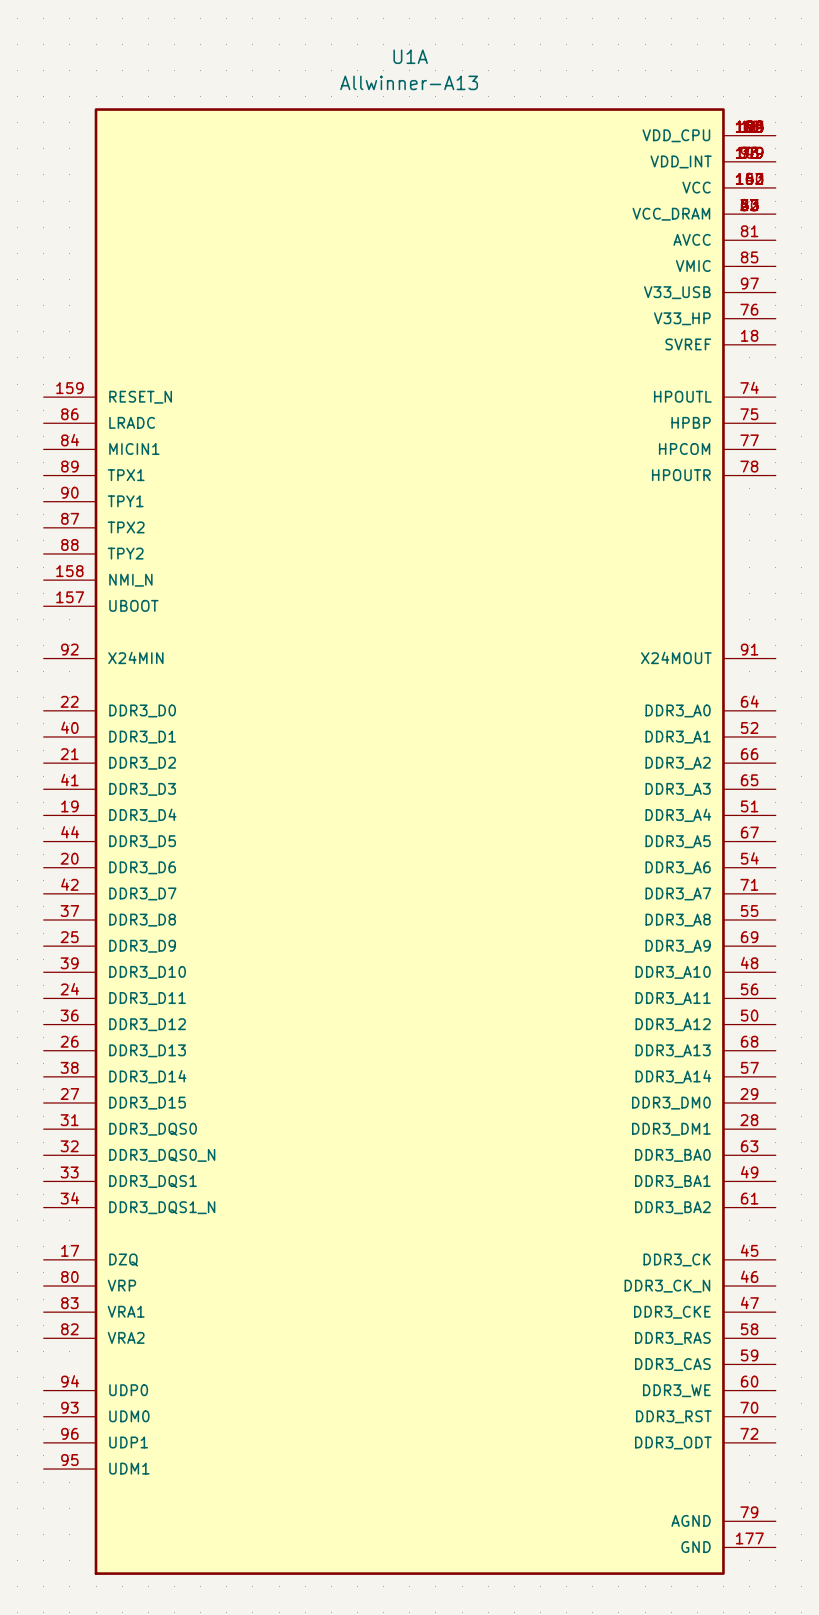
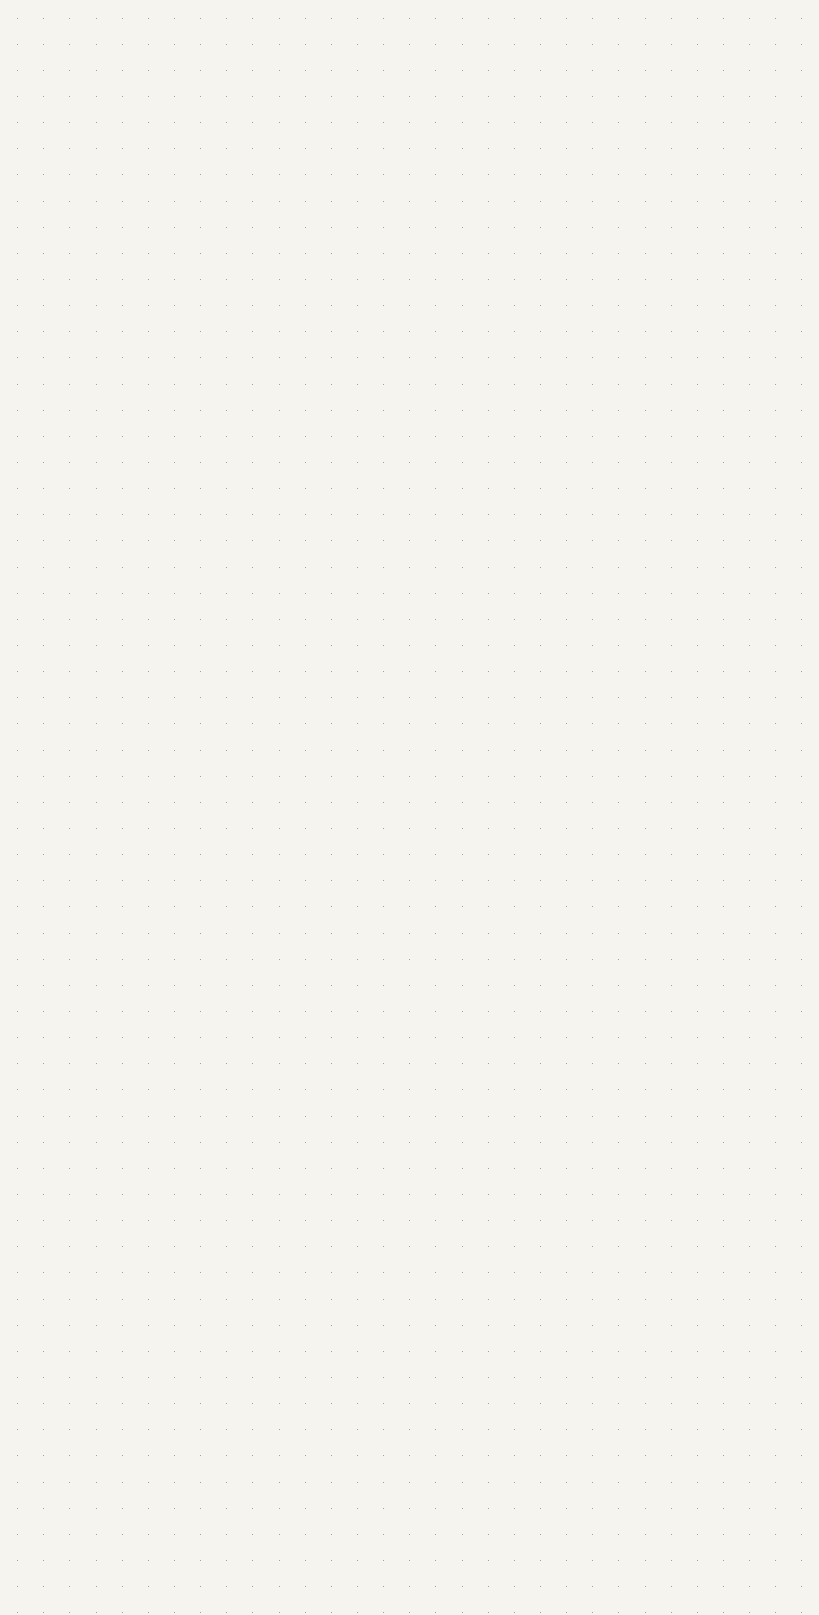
U1A: Allwinner-A13 (409, 841) -> none

